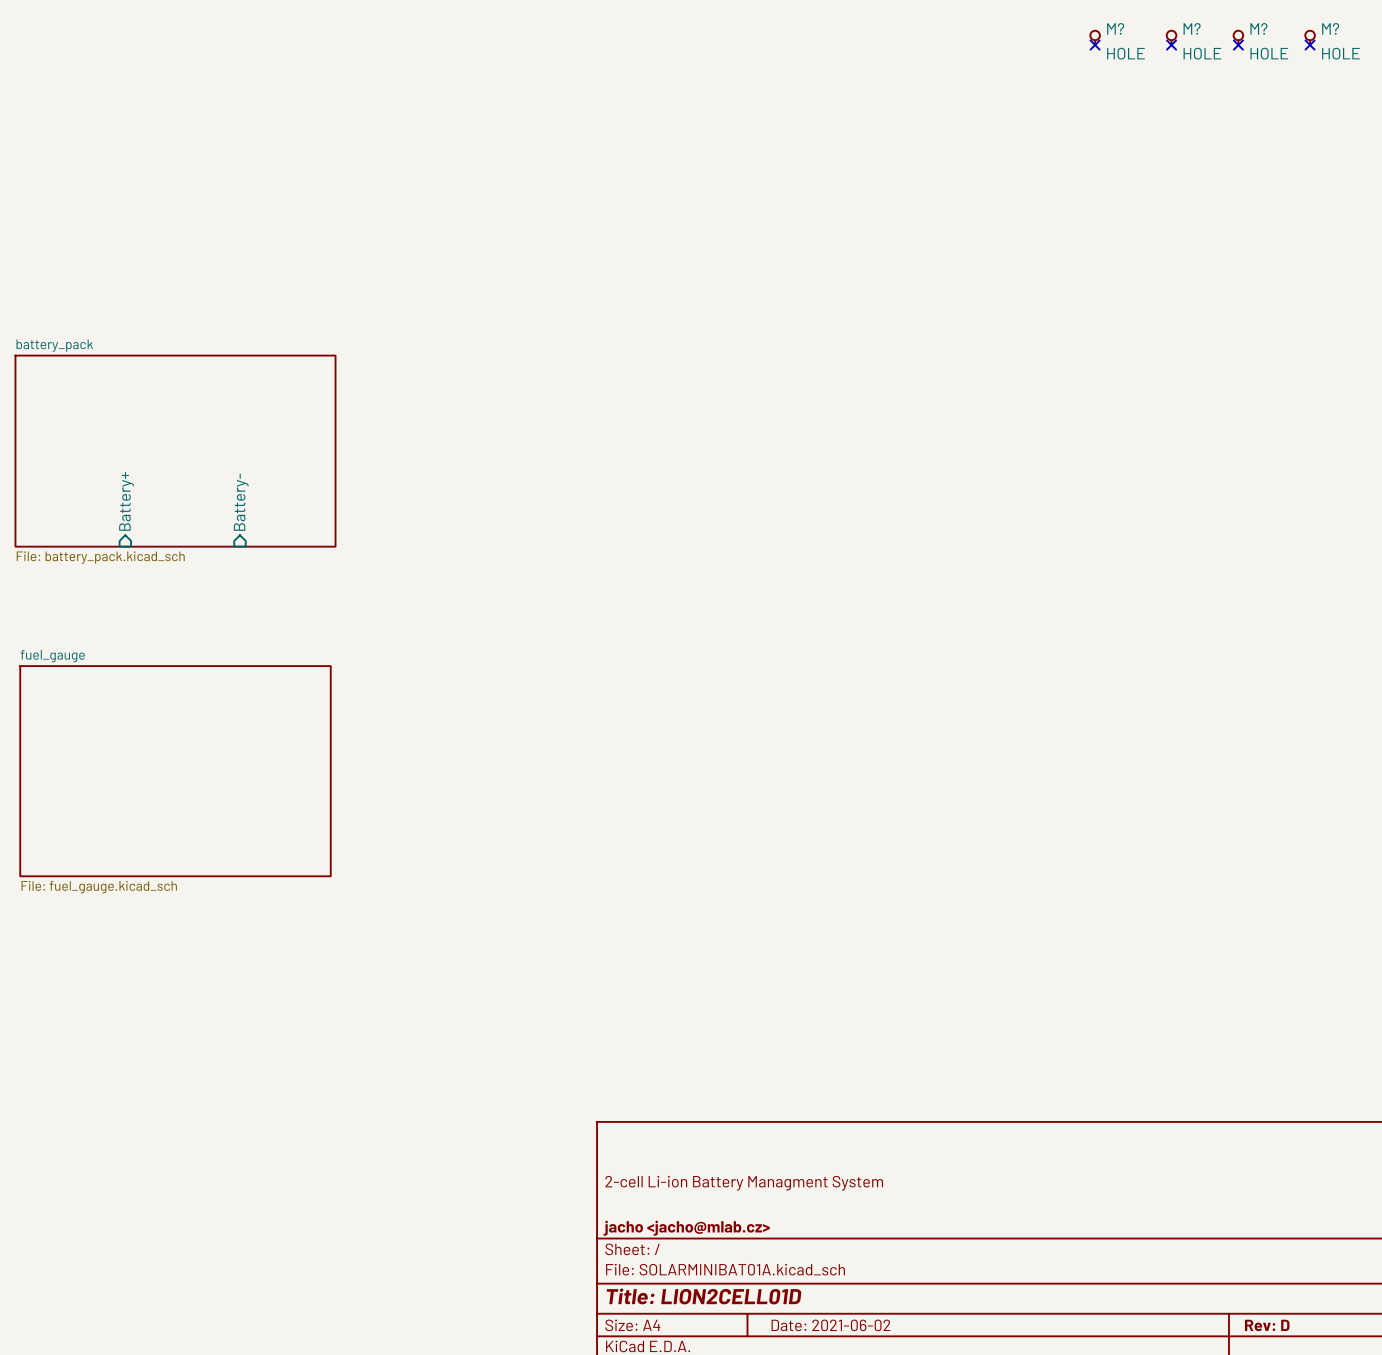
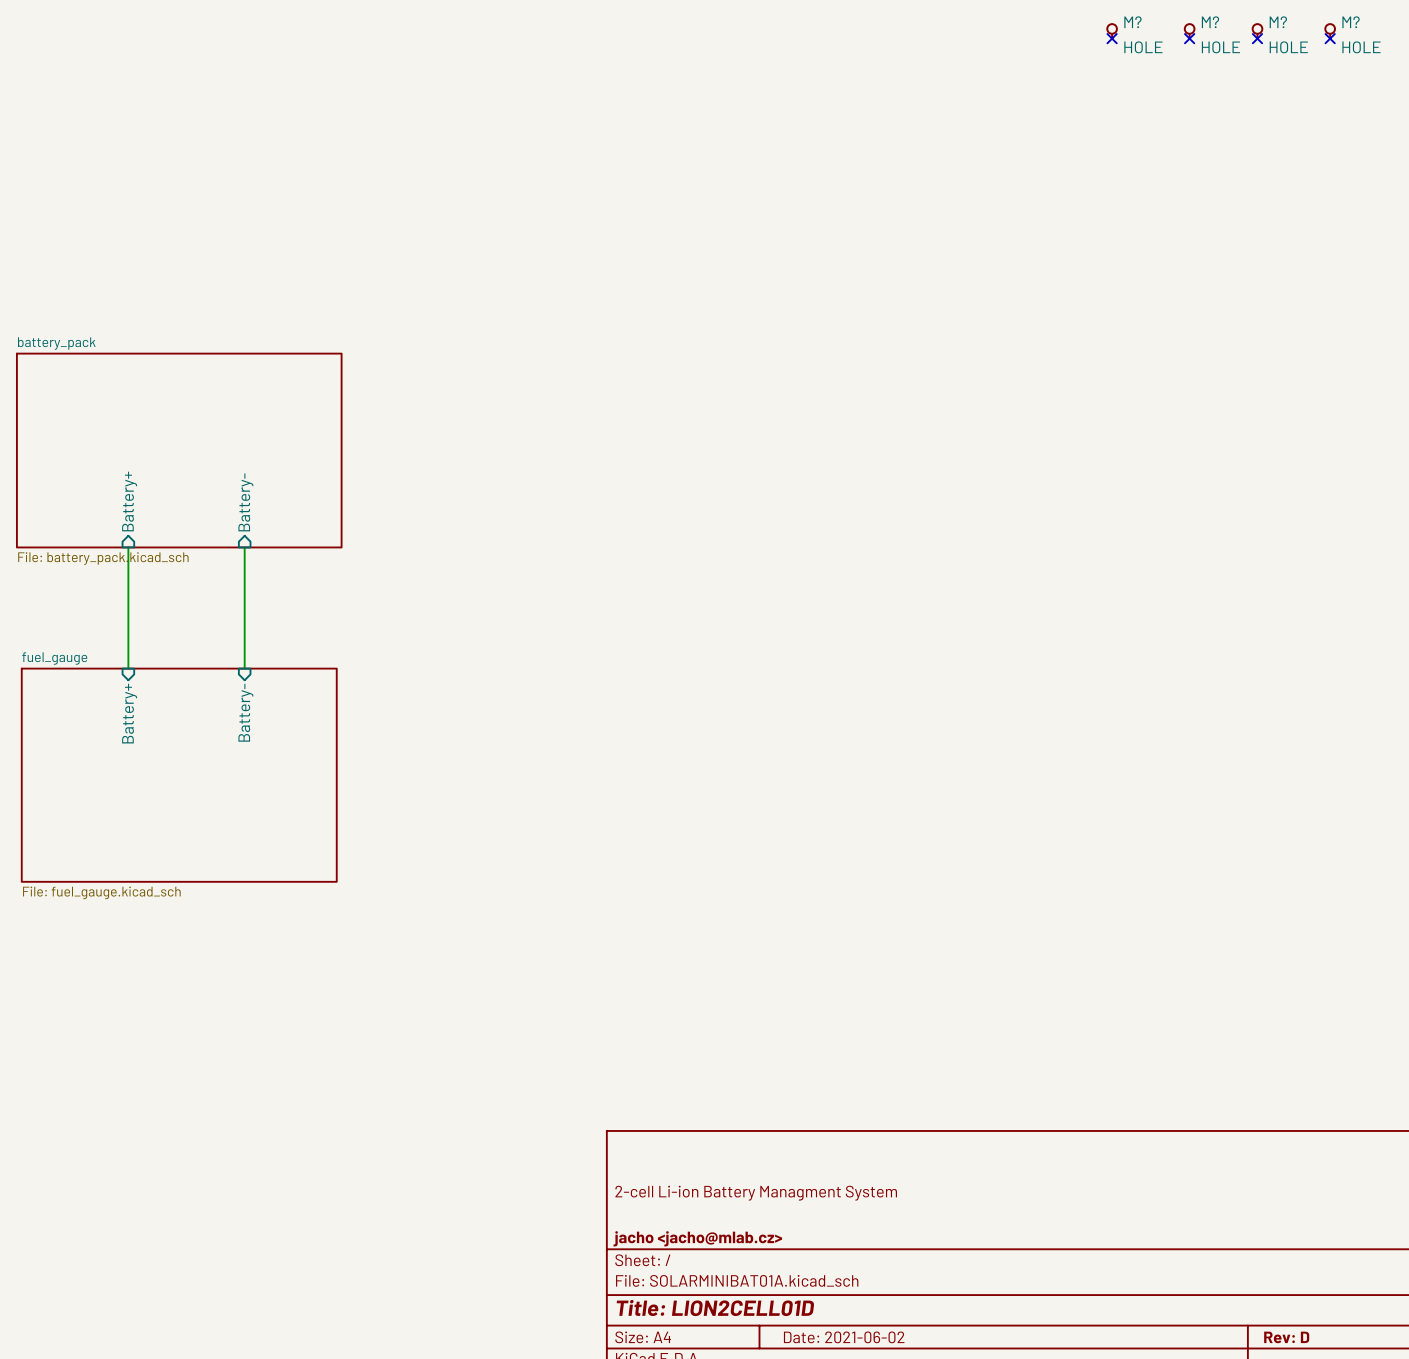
wire: none -> (128, 547) (128, 668)
wire: none -> (244, 547) (244, 668)
sheet pin: none -> Battery- (245, 712)
sheet pin: none -> Battery+ (129, 713)

